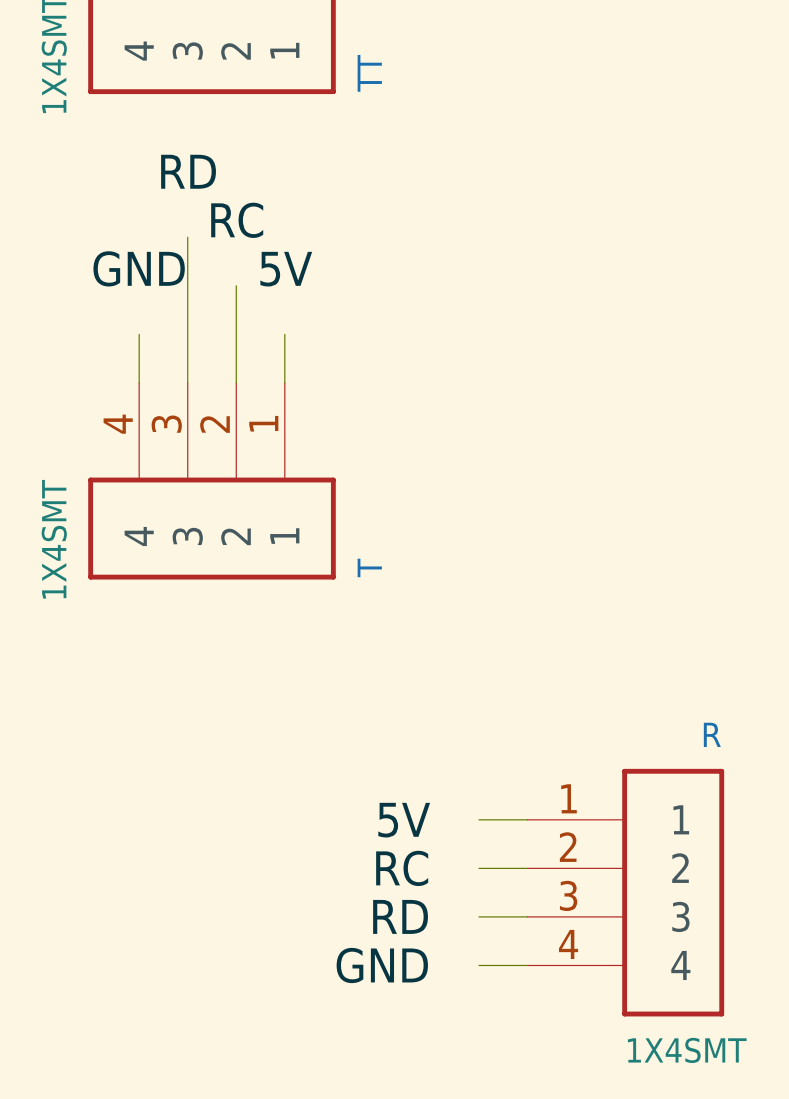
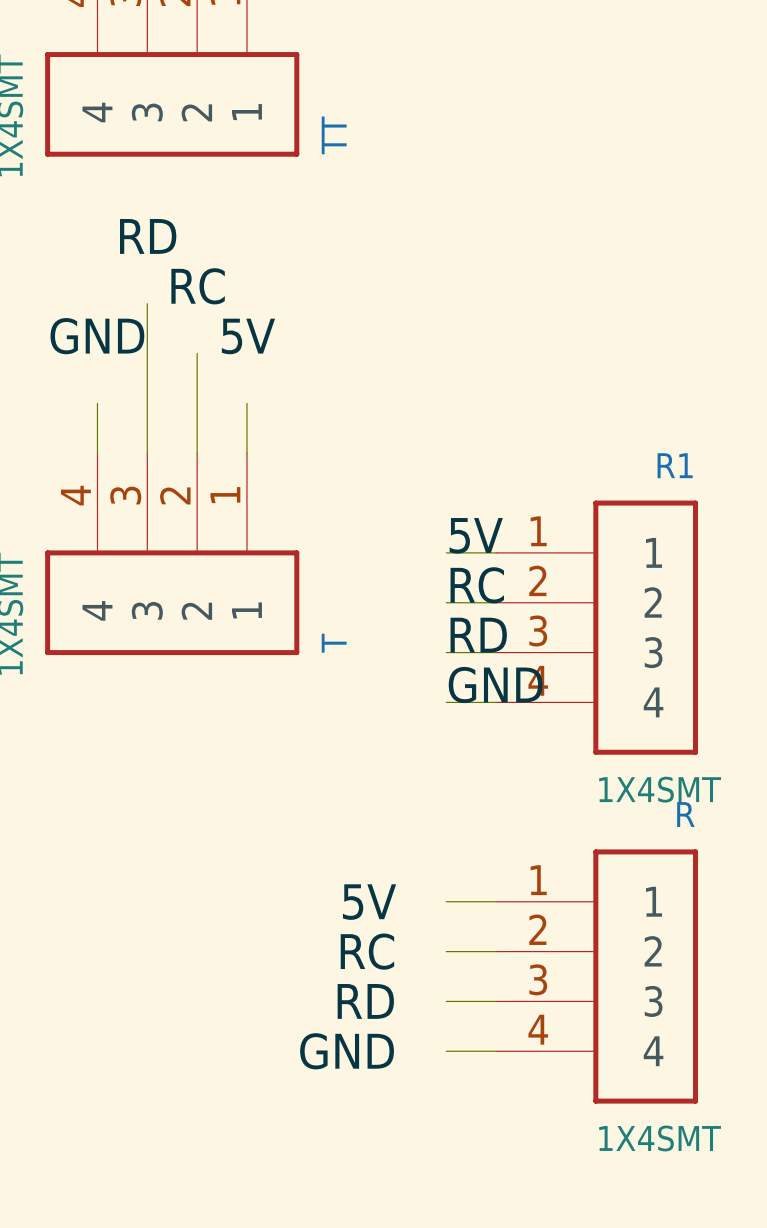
label: none -> 5V (476, 535)
wire: none -> (446, 552) (496, 552)
label: none -> RC (477, 585)
wire: none -> (446, 602) (496, 602)
R1: none -> 1X4SMT (597, 627)
label: none -> RD (478, 635)
wire: none -> (446, 652) (496, 652)
label: none -> GND (495, 684)
wire: none -> (446, 702) (496, 702)

